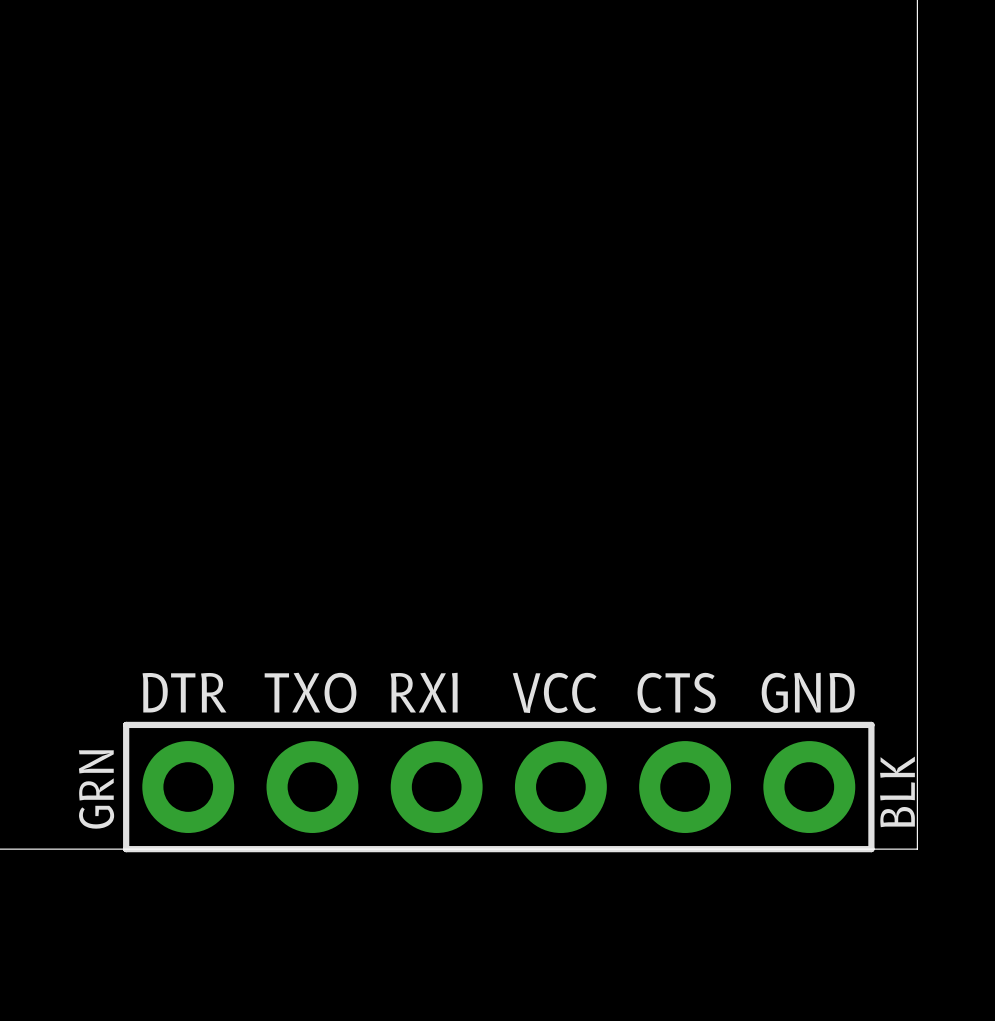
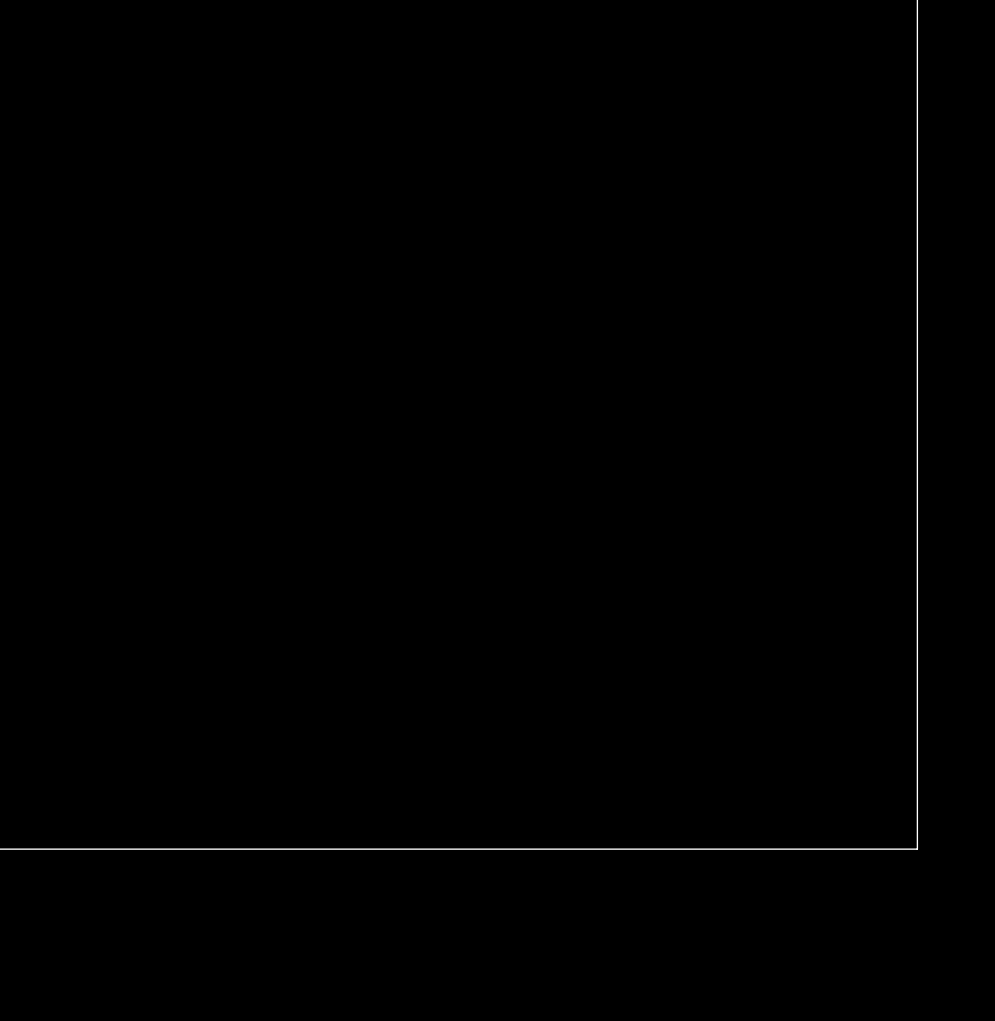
part: (498, 787) -> none

